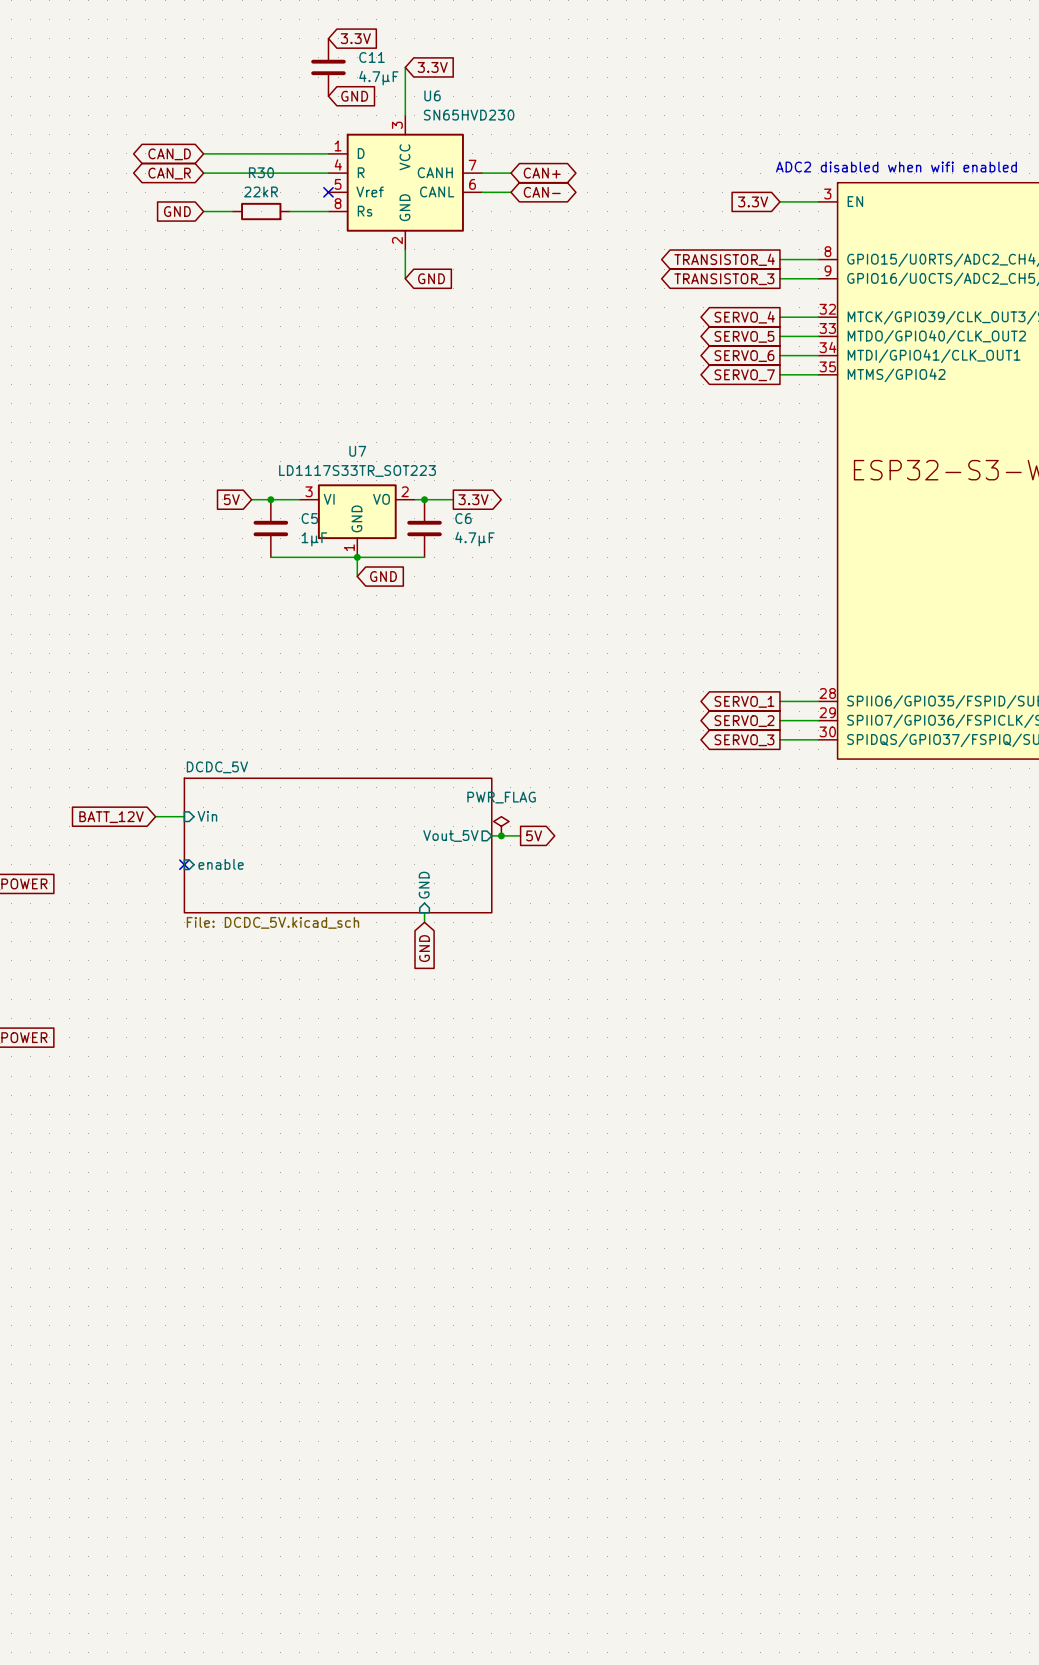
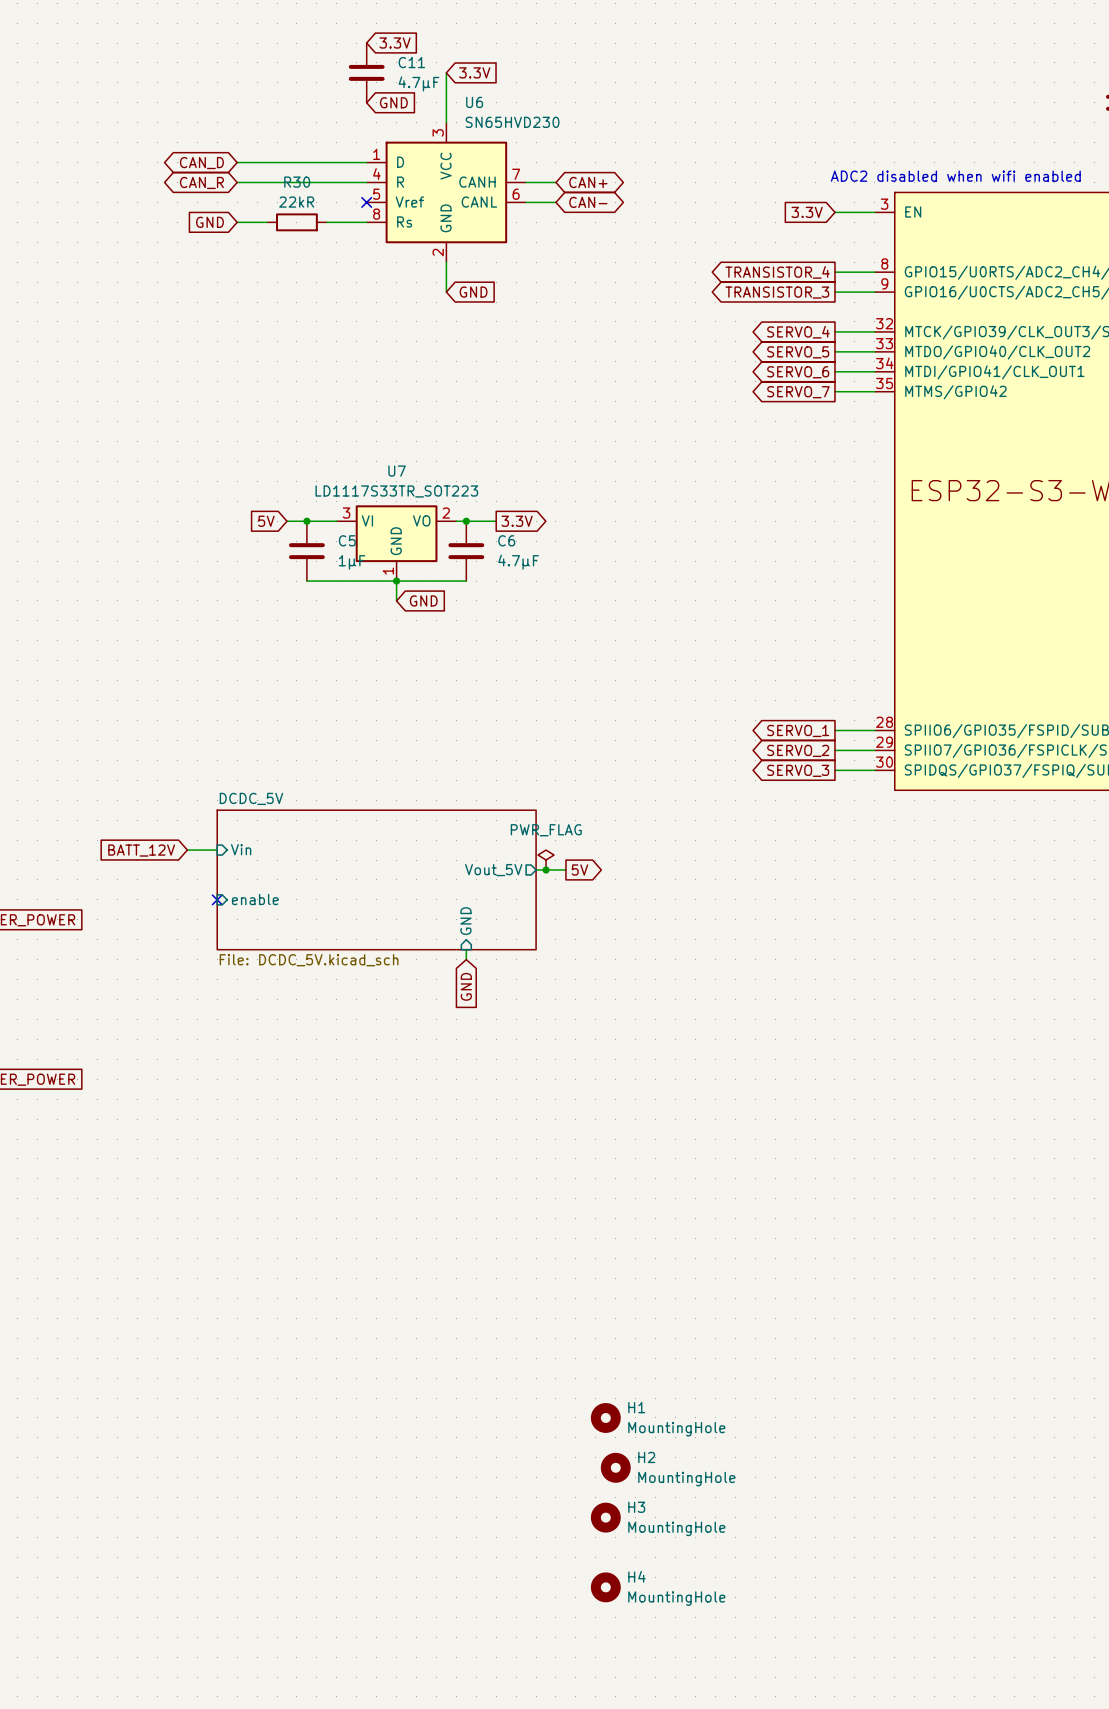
H1: none -> MountingHole (605, 1417)
H2: none -> MountingHole (615, 1467)
H3: none -> MountingHole (605, 1517)
H4: none -> MountingHole (605, 1587)

